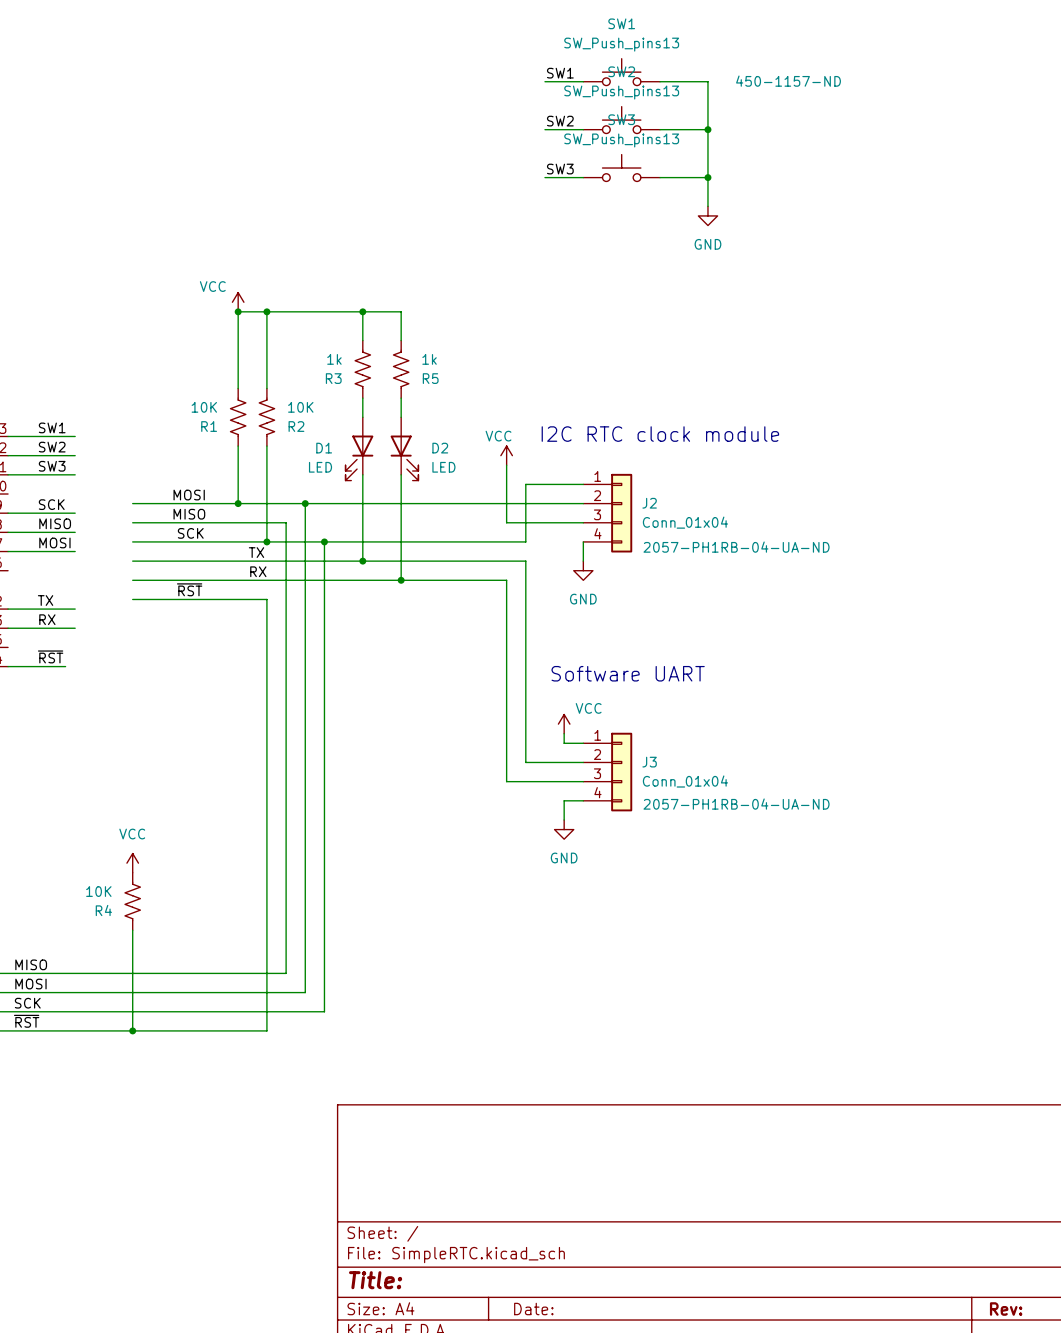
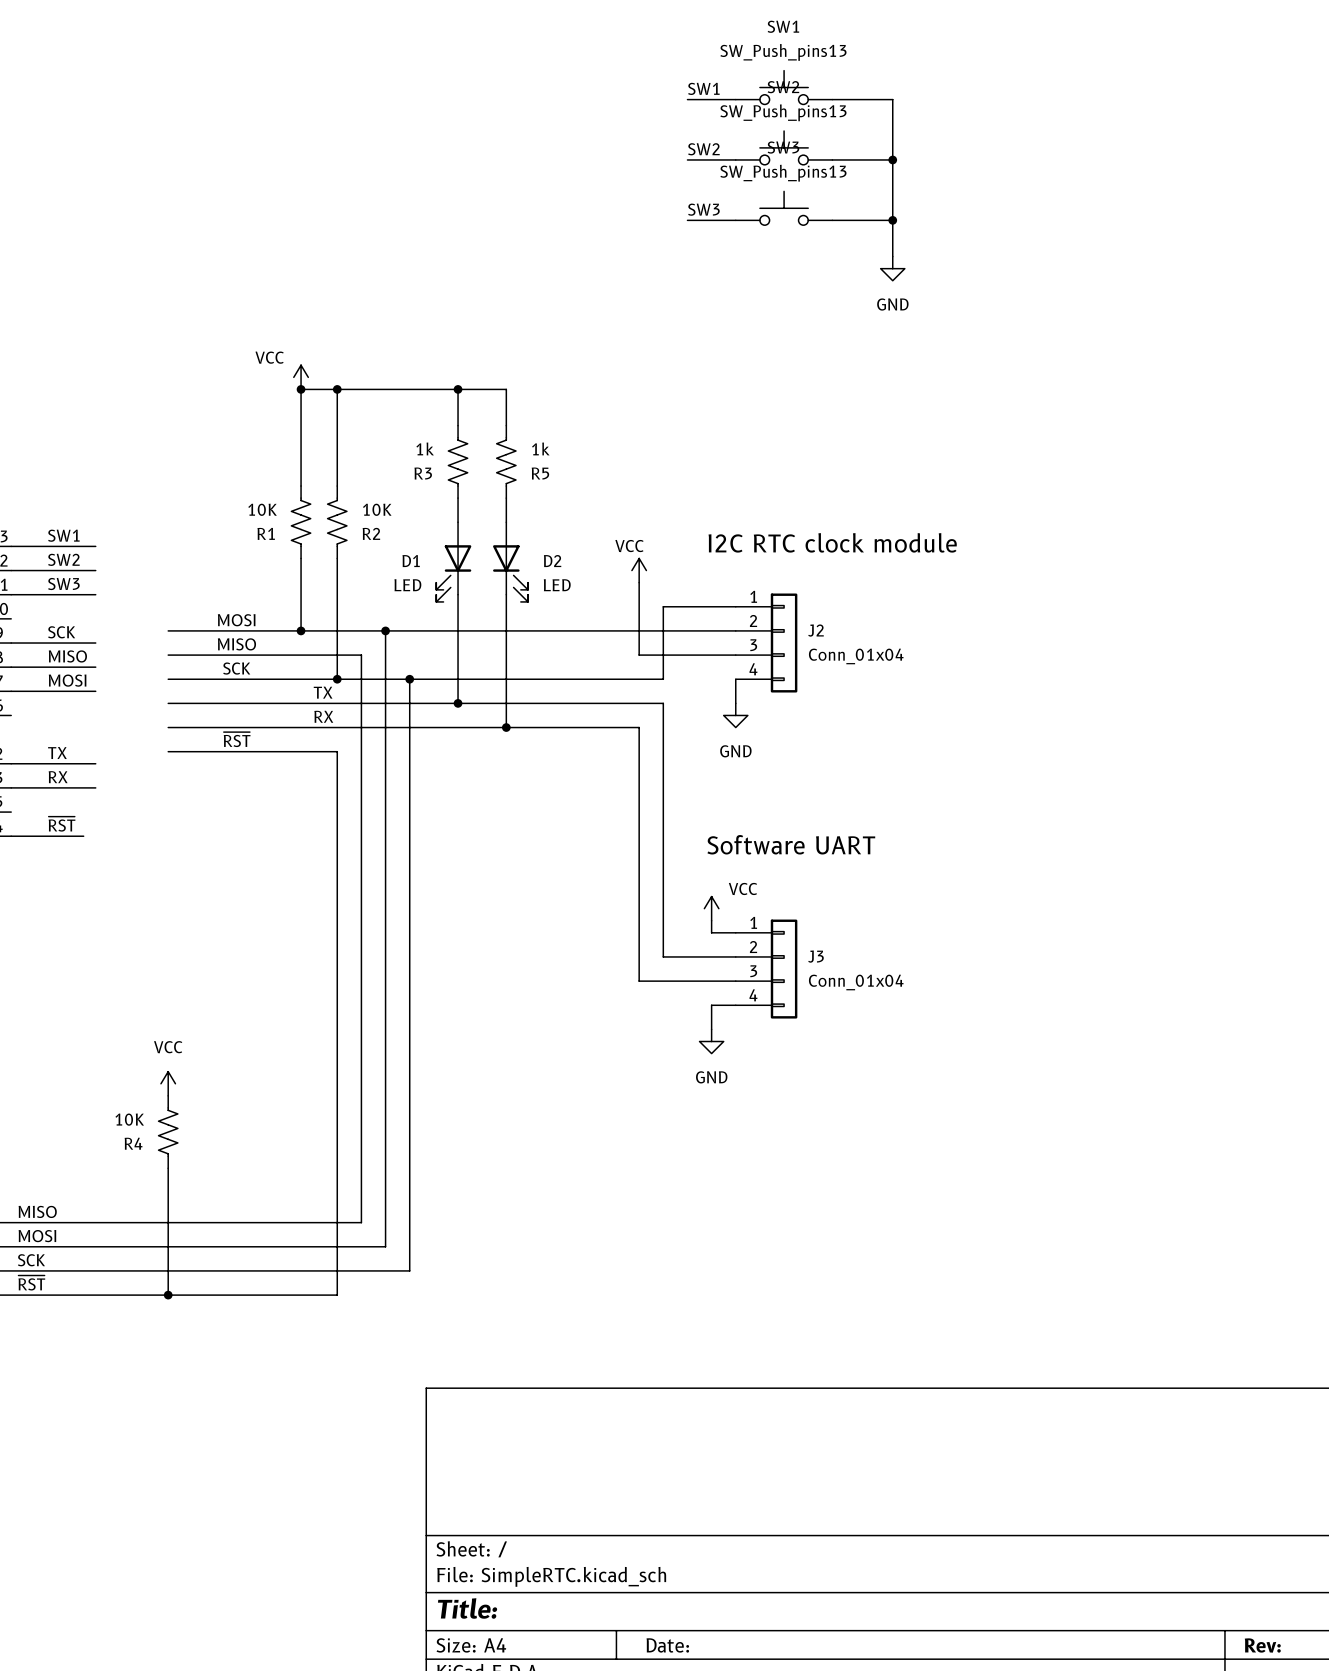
SW1 text: 450-1157-ND (788, 81) -> none
J2 text: 2057-PH1RB-04-UA-ND (736, 547) -> none
J3 text: 2057-PH1RB-04-UA-ND (736, 804) -> none

